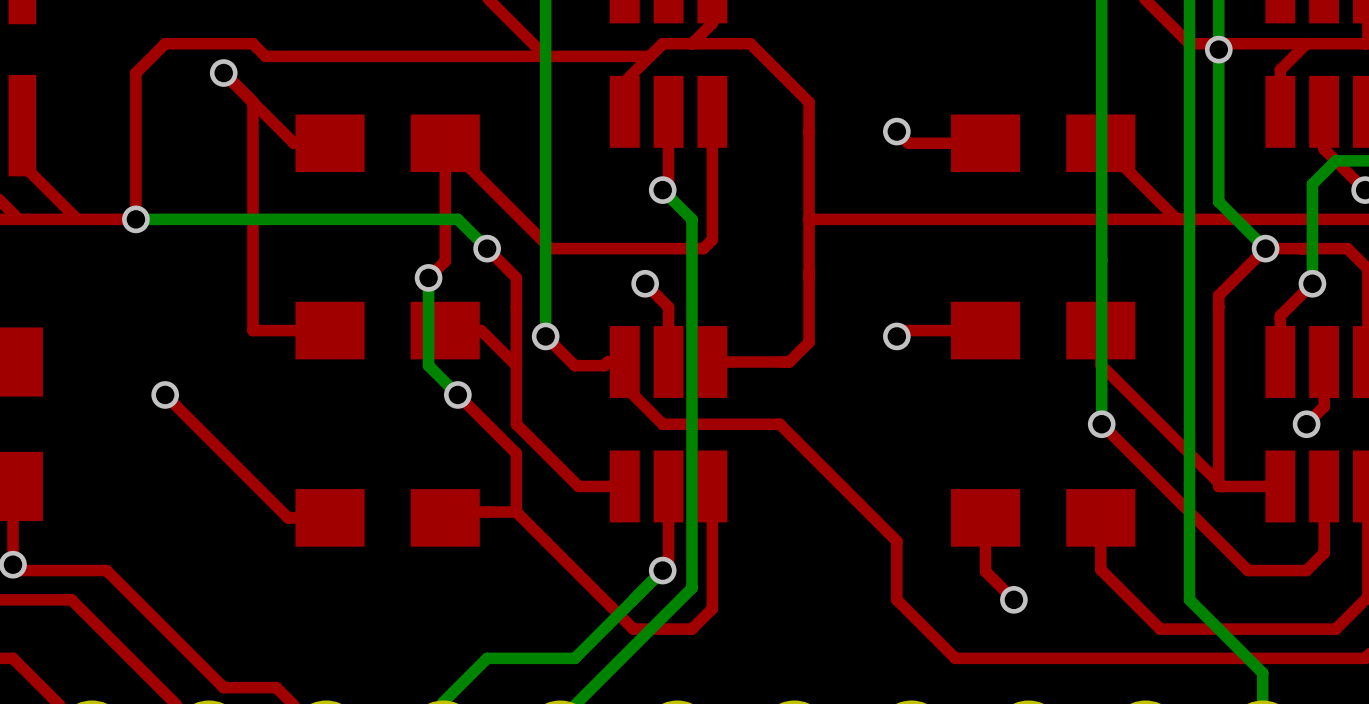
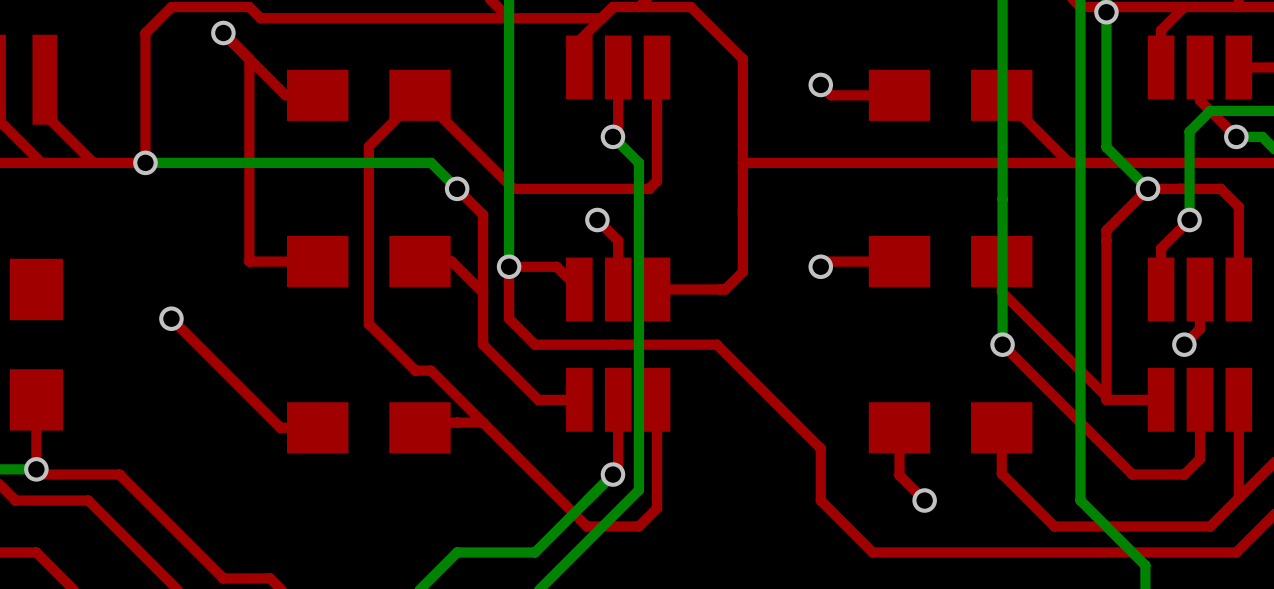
top track: (445, 143) (445, 261) (428, 277) -> (419, 95) (368, 146) (368, 323) (415, 370) (431, 370) (483, 422)
bottom track: (428, 277) (428, 365) (457, 394) -> none
via: (428, 277) -> none
top track: (545, 336) (574, 365) (604, 365) (607, 362) (624, 362) -> none
top track: (624, 386) (662, 424) -> (579, 289) (556, 266) (509, 266) (509, 318) (535, 344) (612, 344)
top track: (457, 394) (516, 453) (516, 512) -> none
via: (457, 394) -> none

